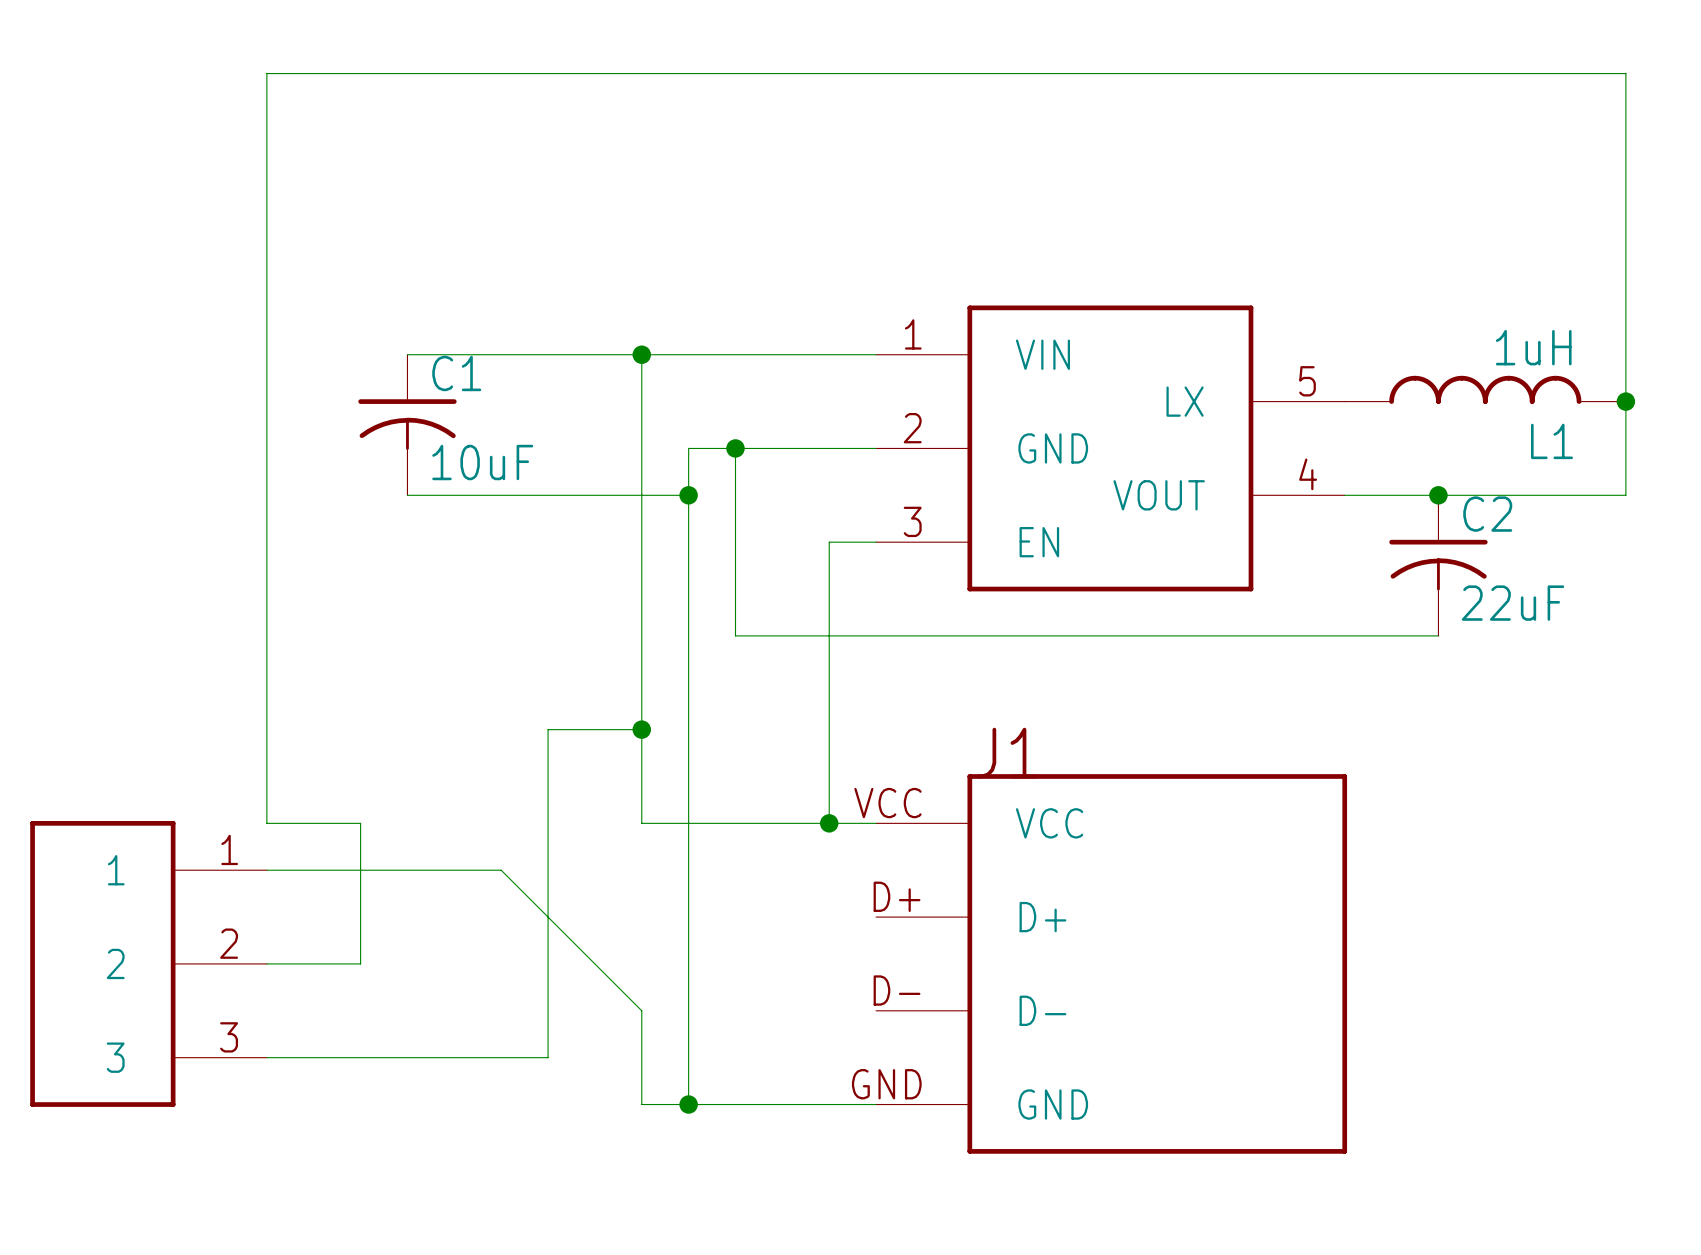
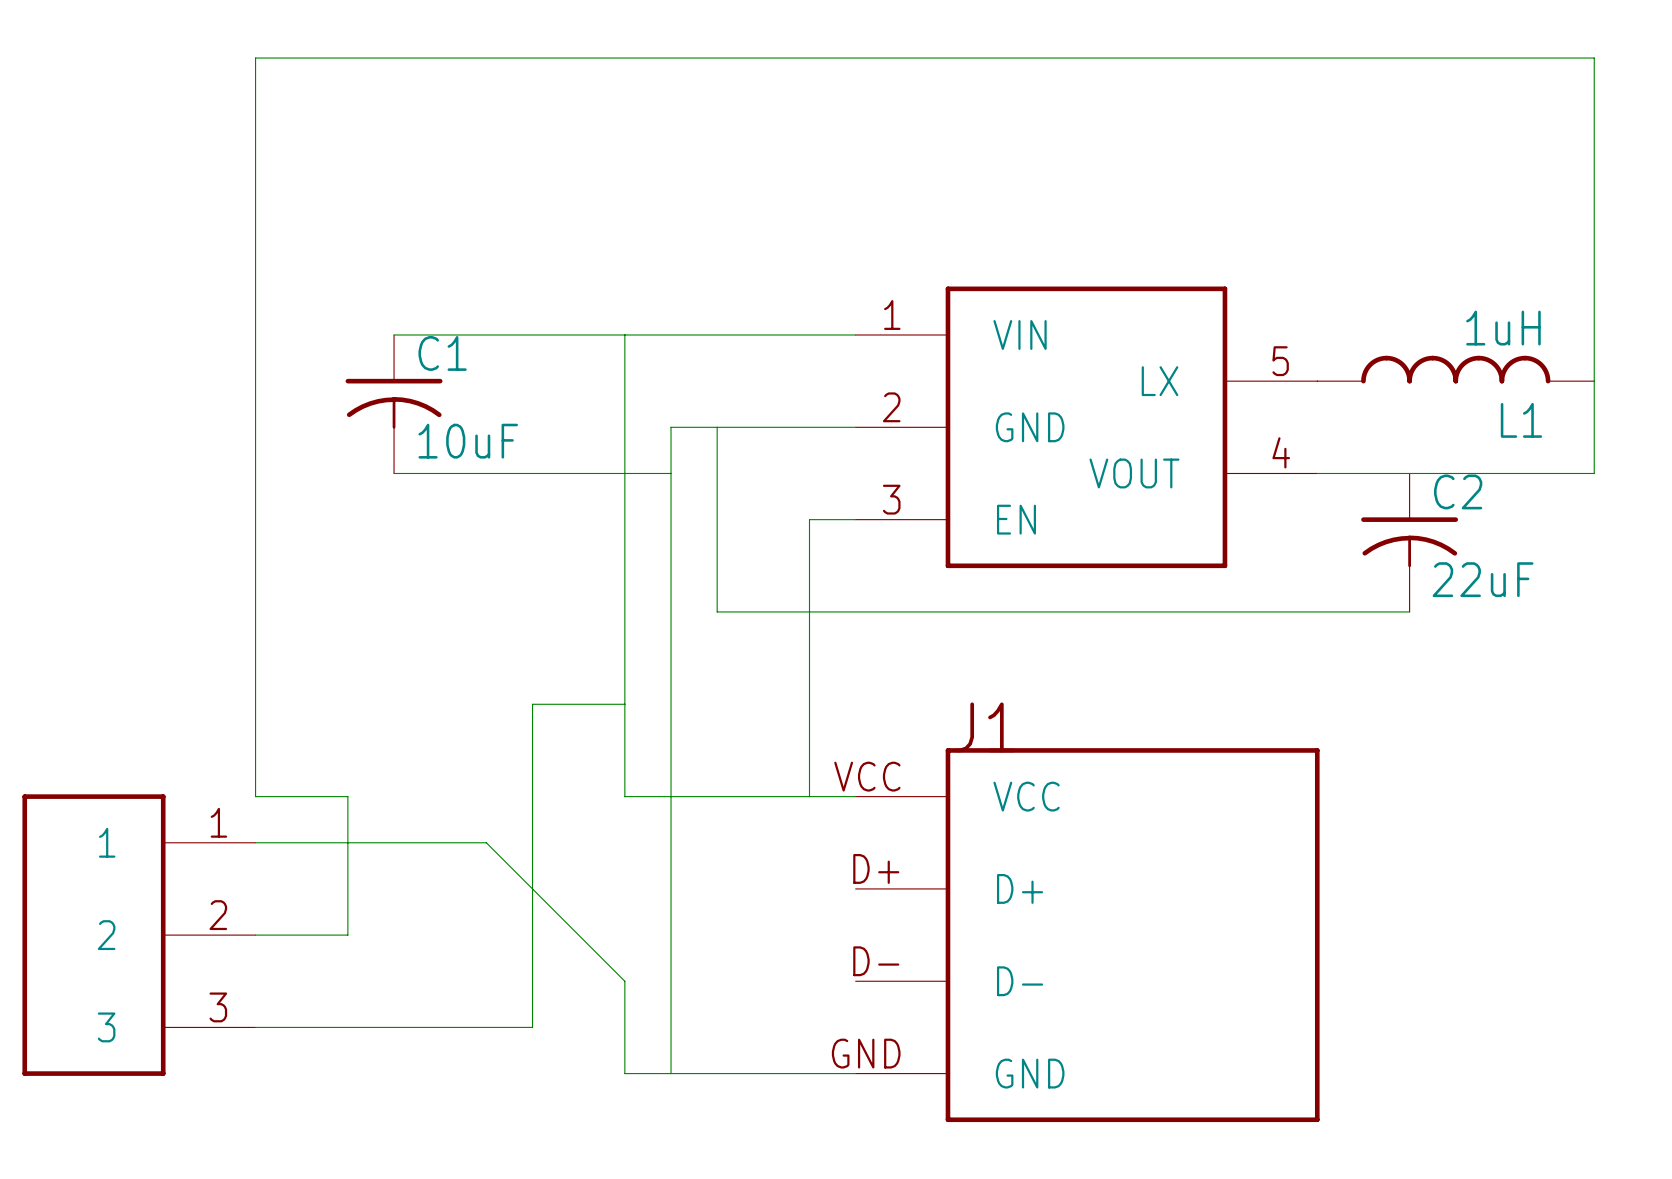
junction: (641, 354) -> none
junction: (1625, 401) -> none
junction: (735, 448) -> none
junction: (688, 495) -> none
junction: (1438, 495) -> none
junction: (641, 729) -> none
junction: (829, 823) -> none
junction: (688, 1104) -> none

